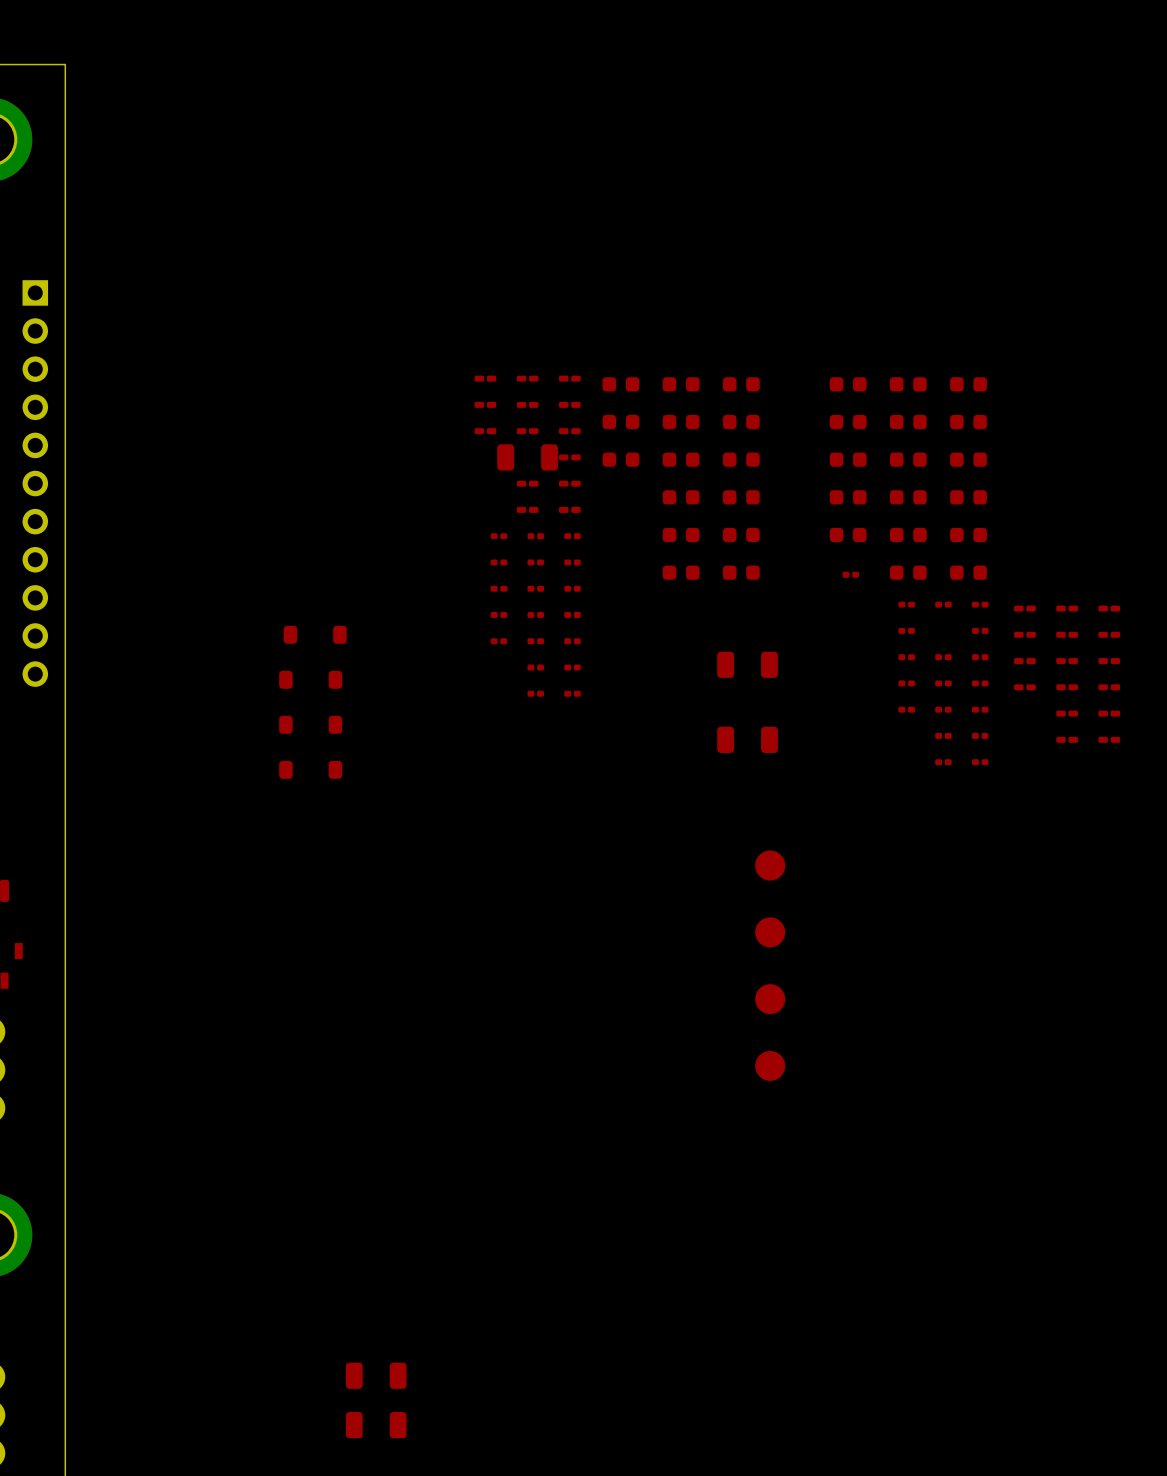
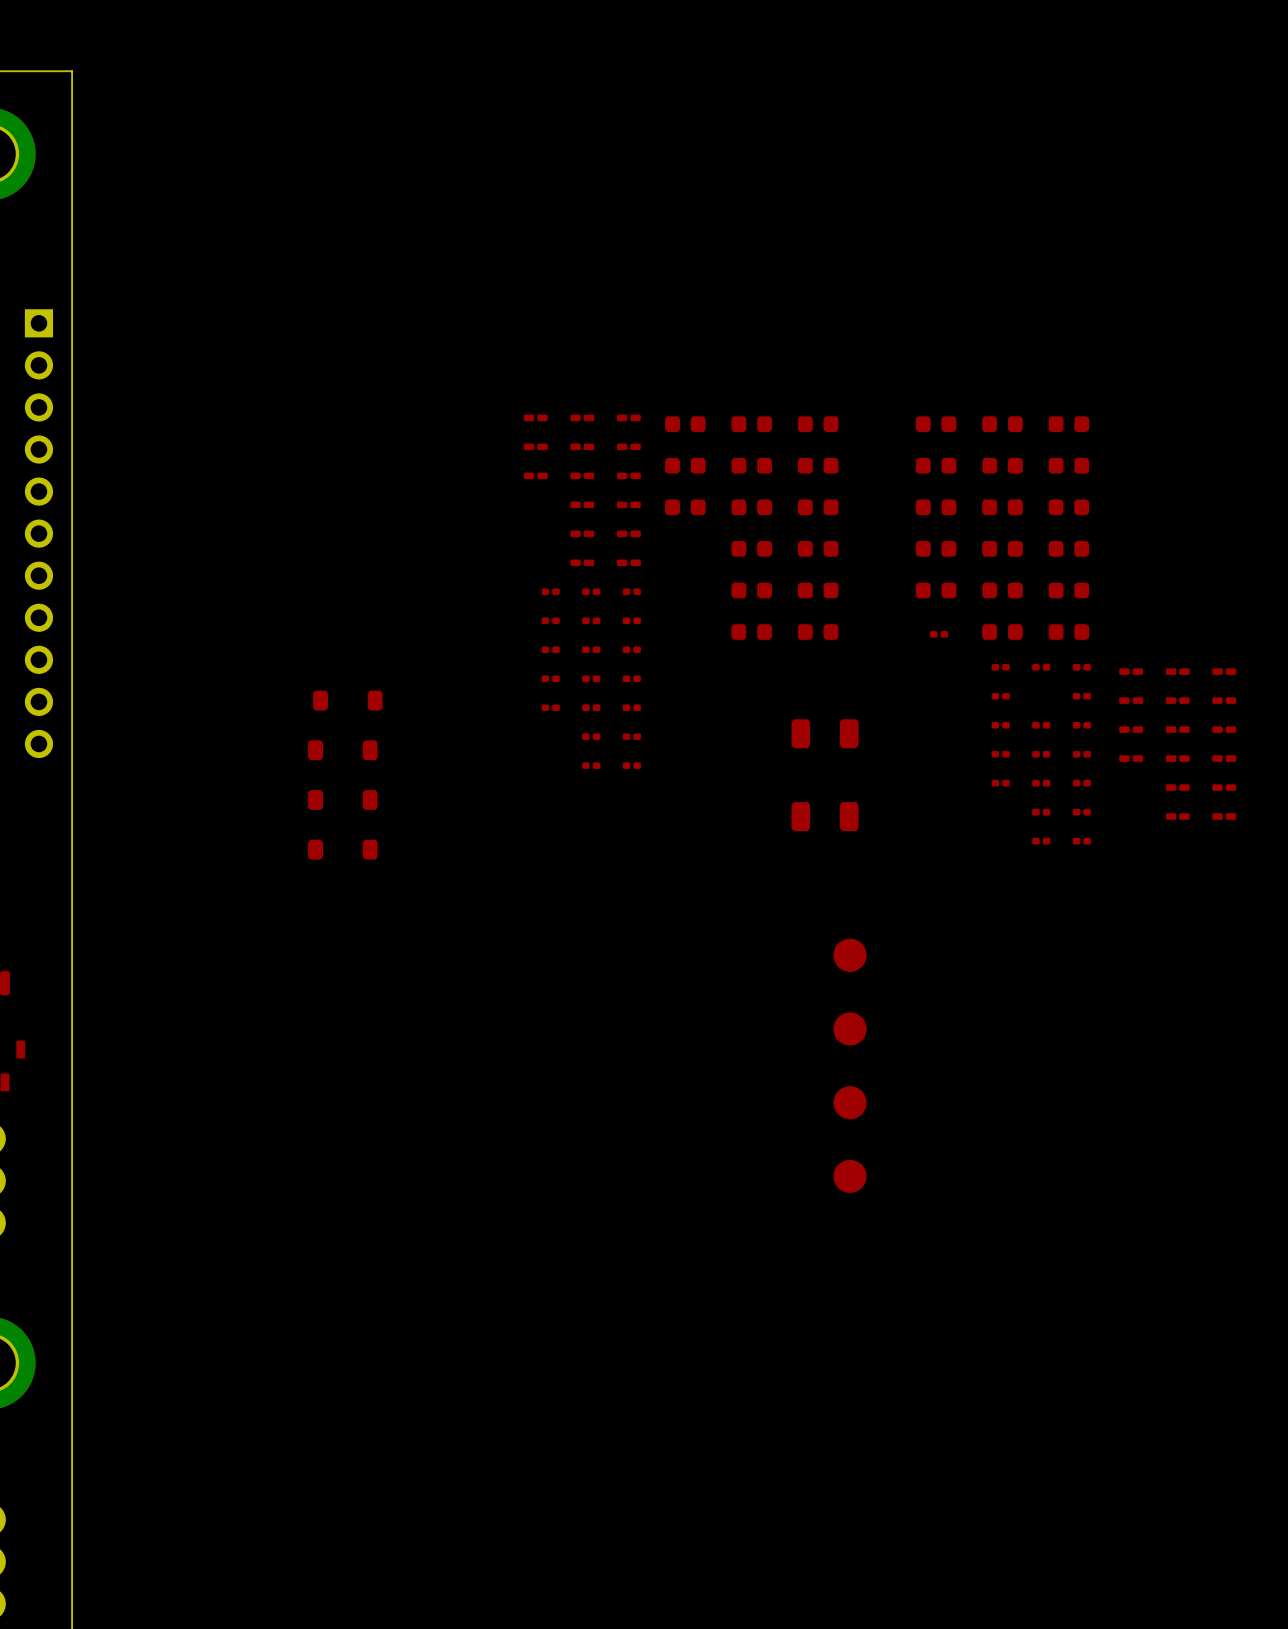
part footprint: [497, 444, 559, 471] -> [570, 501, 595, 509]
part: (376, 1375) -> none
part: (376, 1425) -> none

